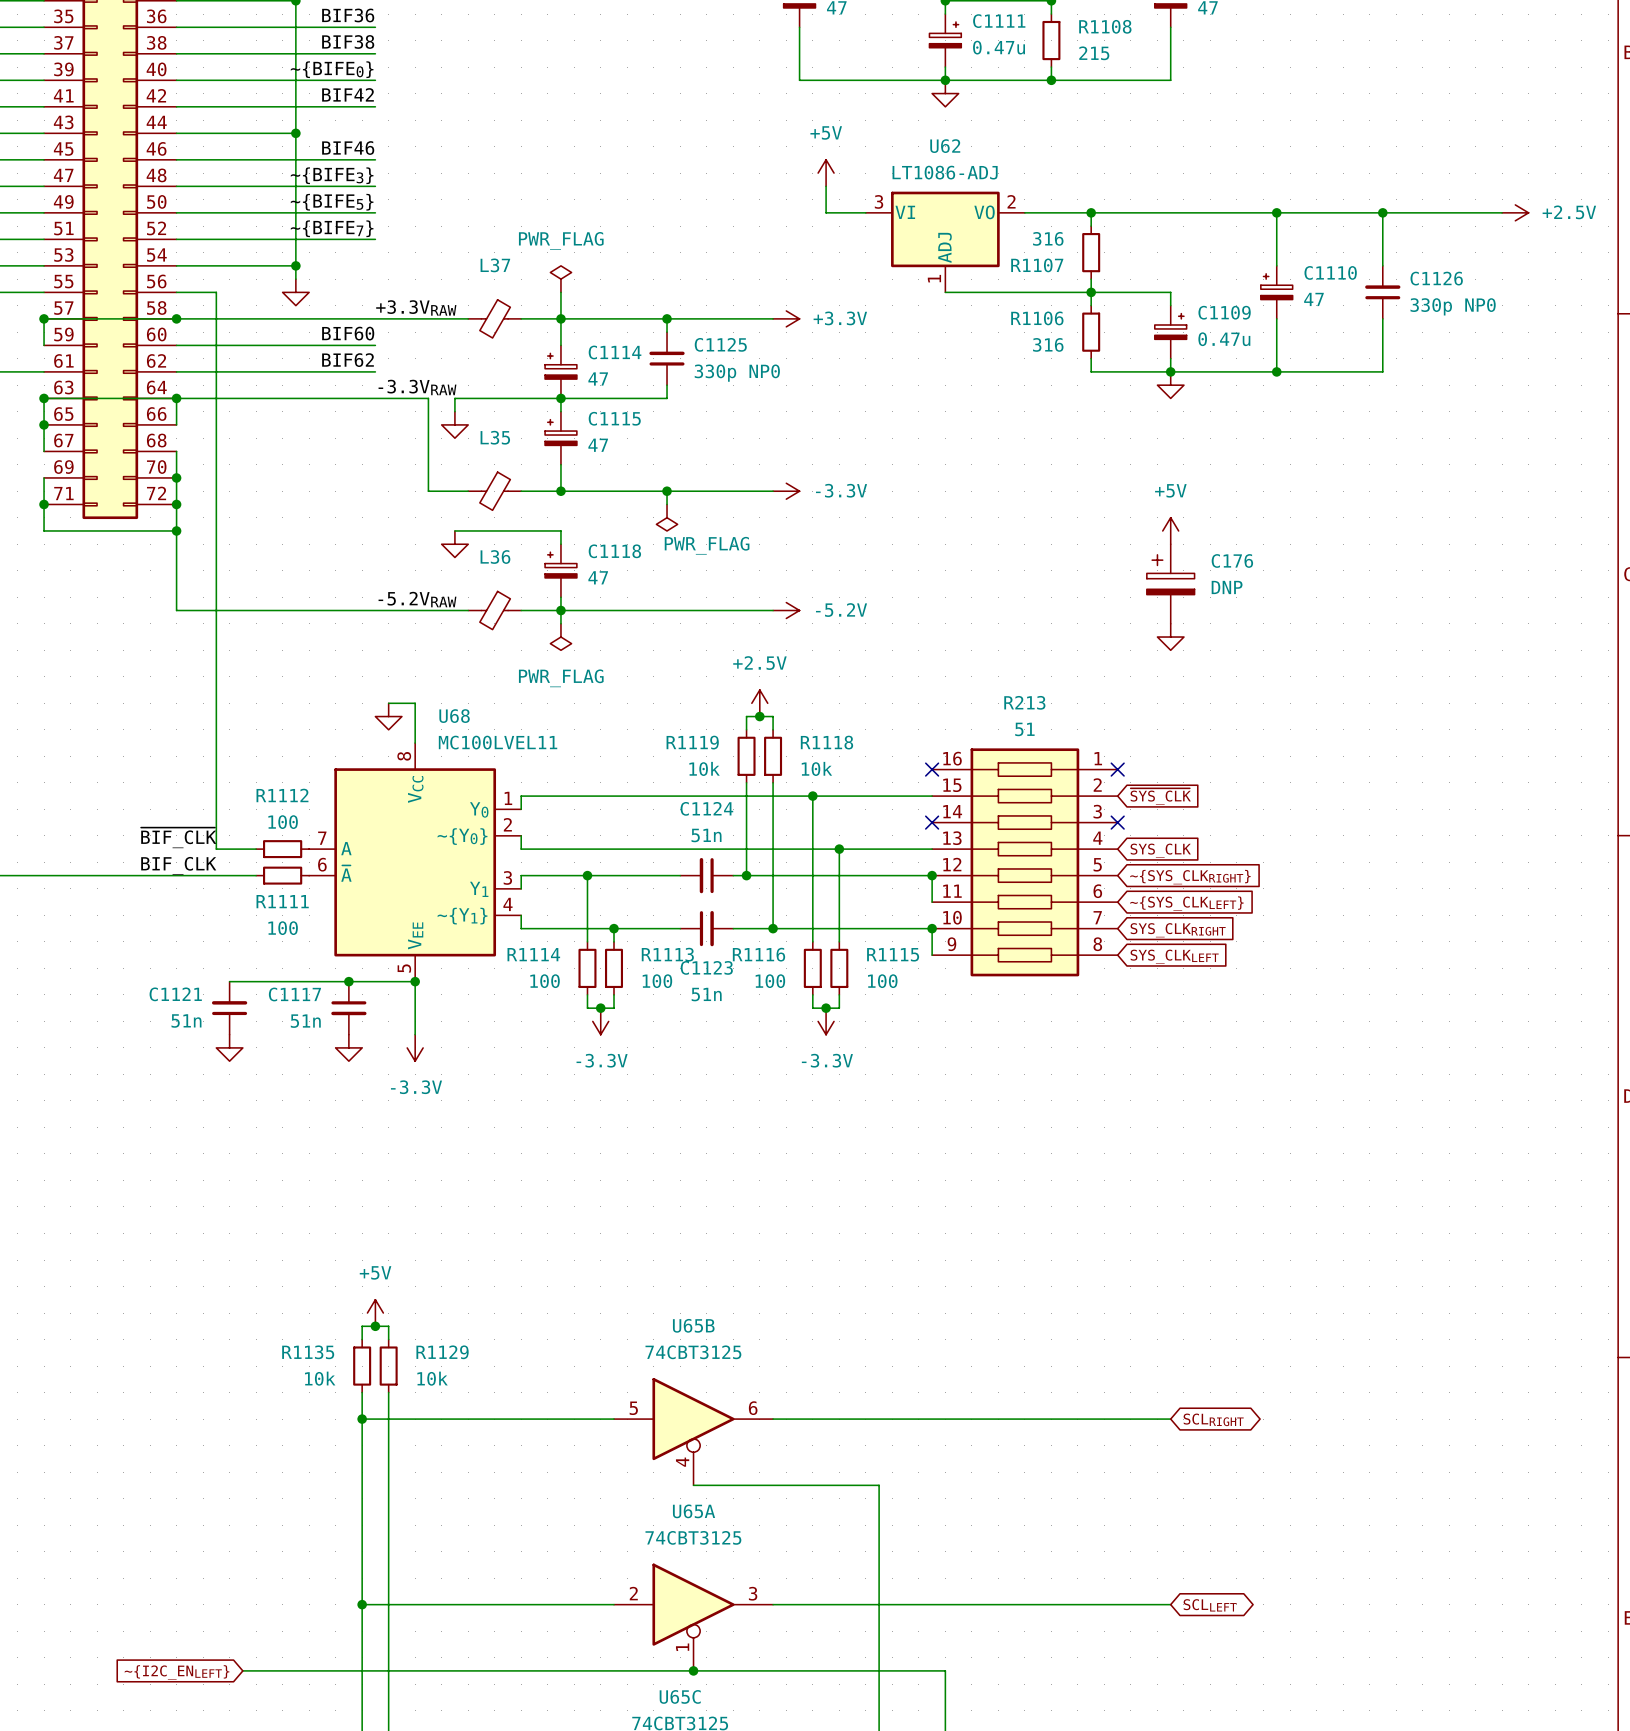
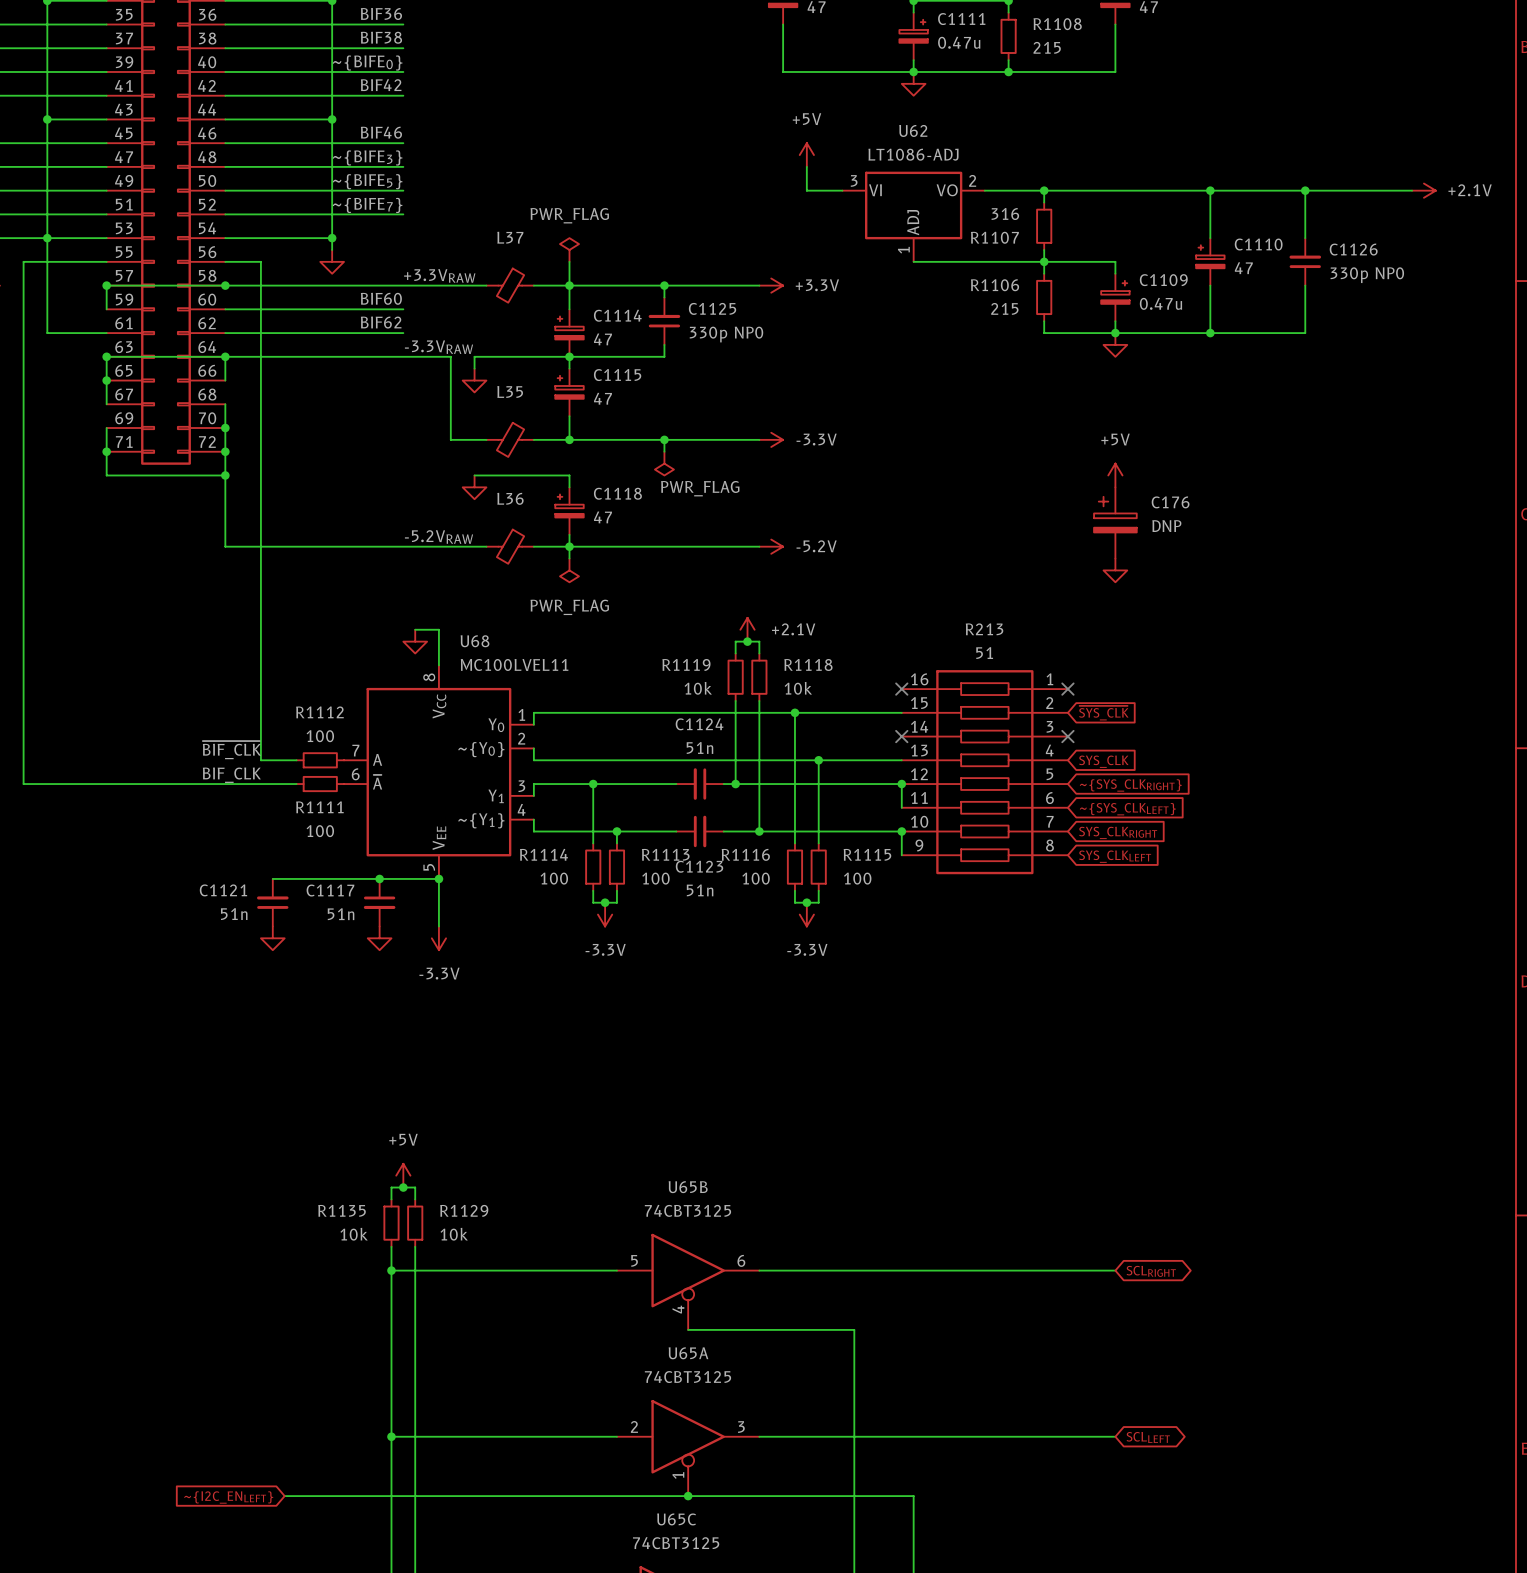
power symbol: +2.5V (1515, 212) -> +2.1V (1423, 190)
R1106 value: 316 (1048, 344) -> 215 (1004, 308)
power symbol: +2.5V (759, 703) -> +2.1V (747, 629)

